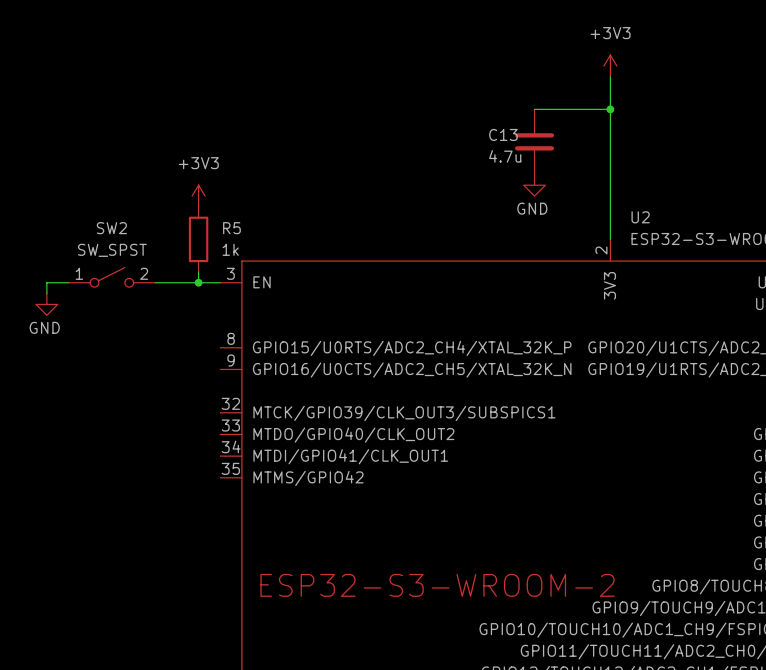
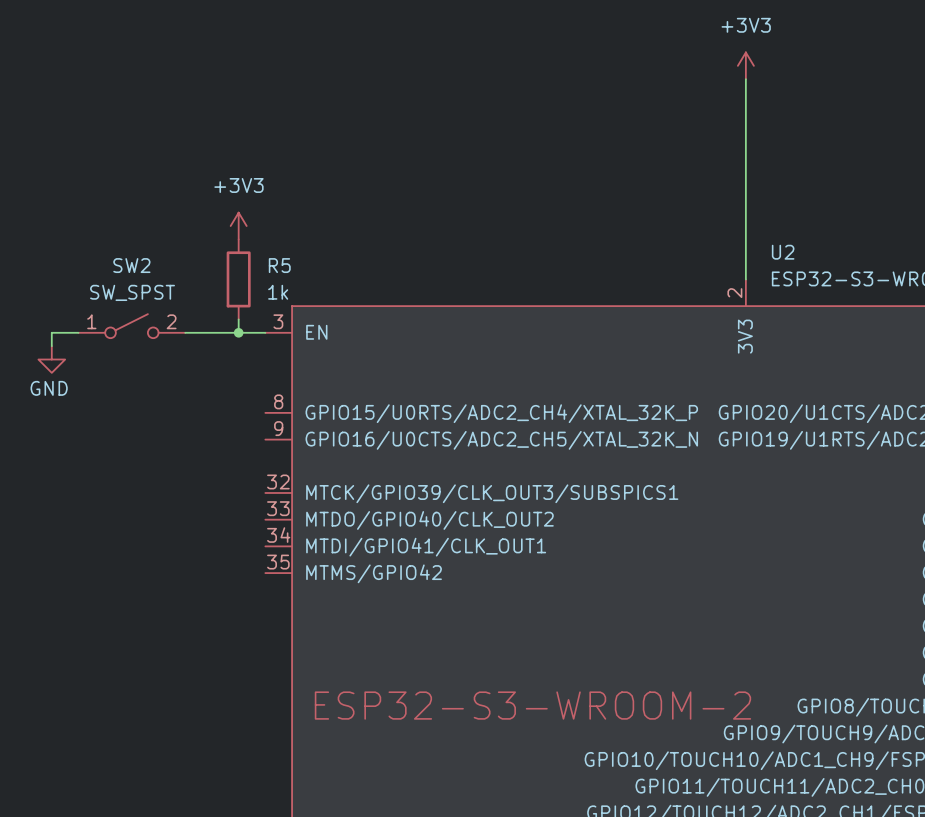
wire: (534, 109) (610, 109) -> none
junction: (610, 109) -> none
C13: 4.7u (534, 141) -> none
power symbol: GND (534, 185) -> none

